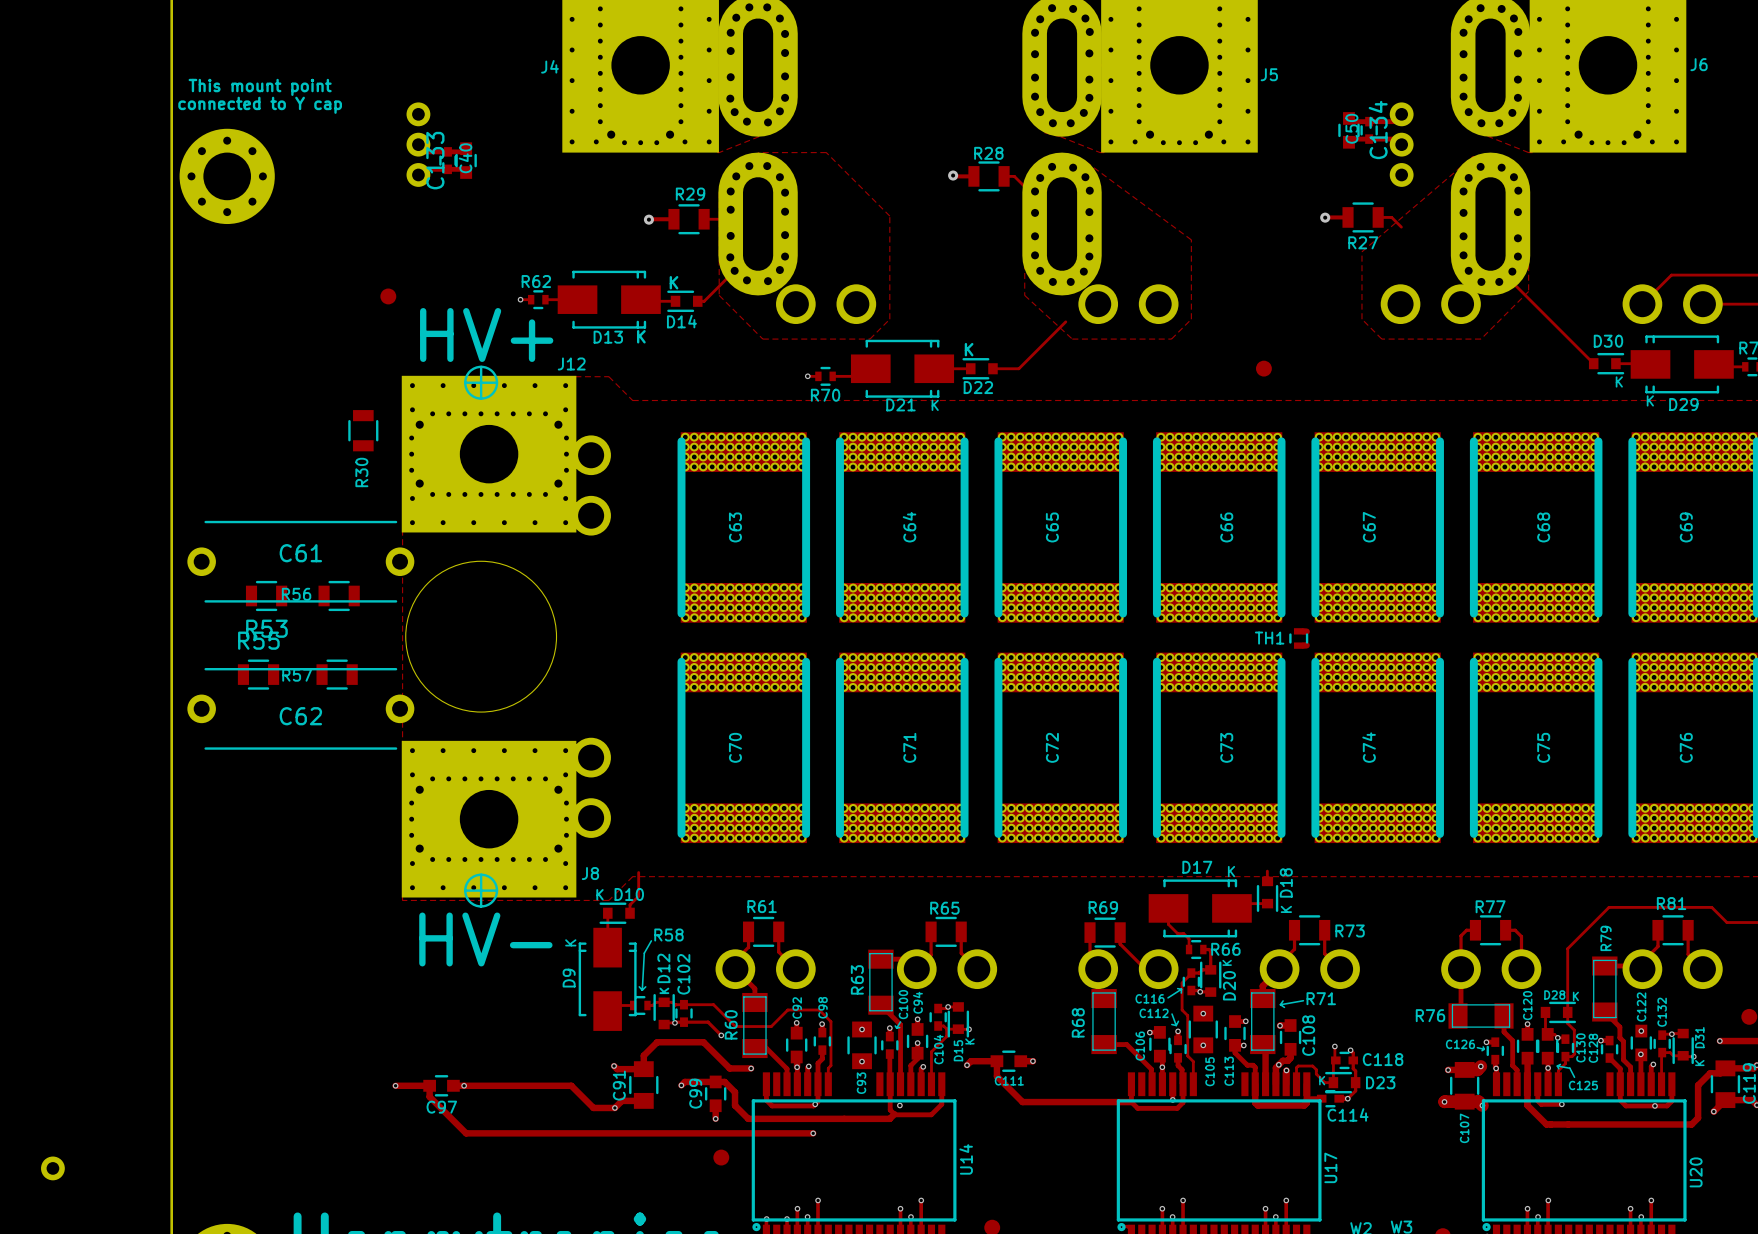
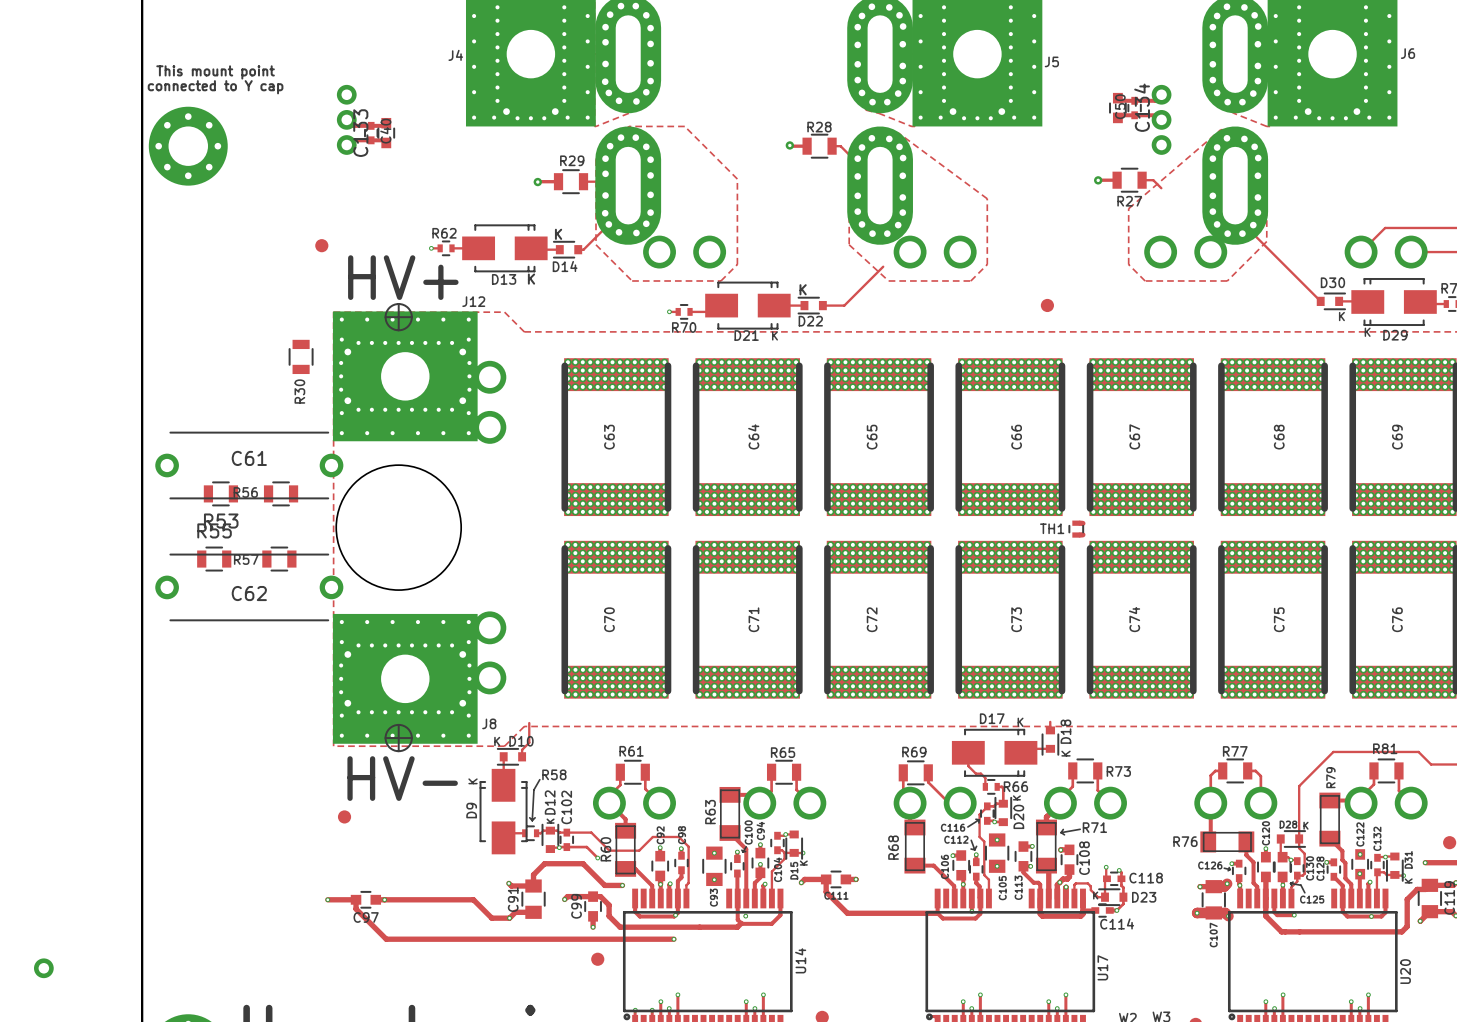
part: none -> (344, 816)

